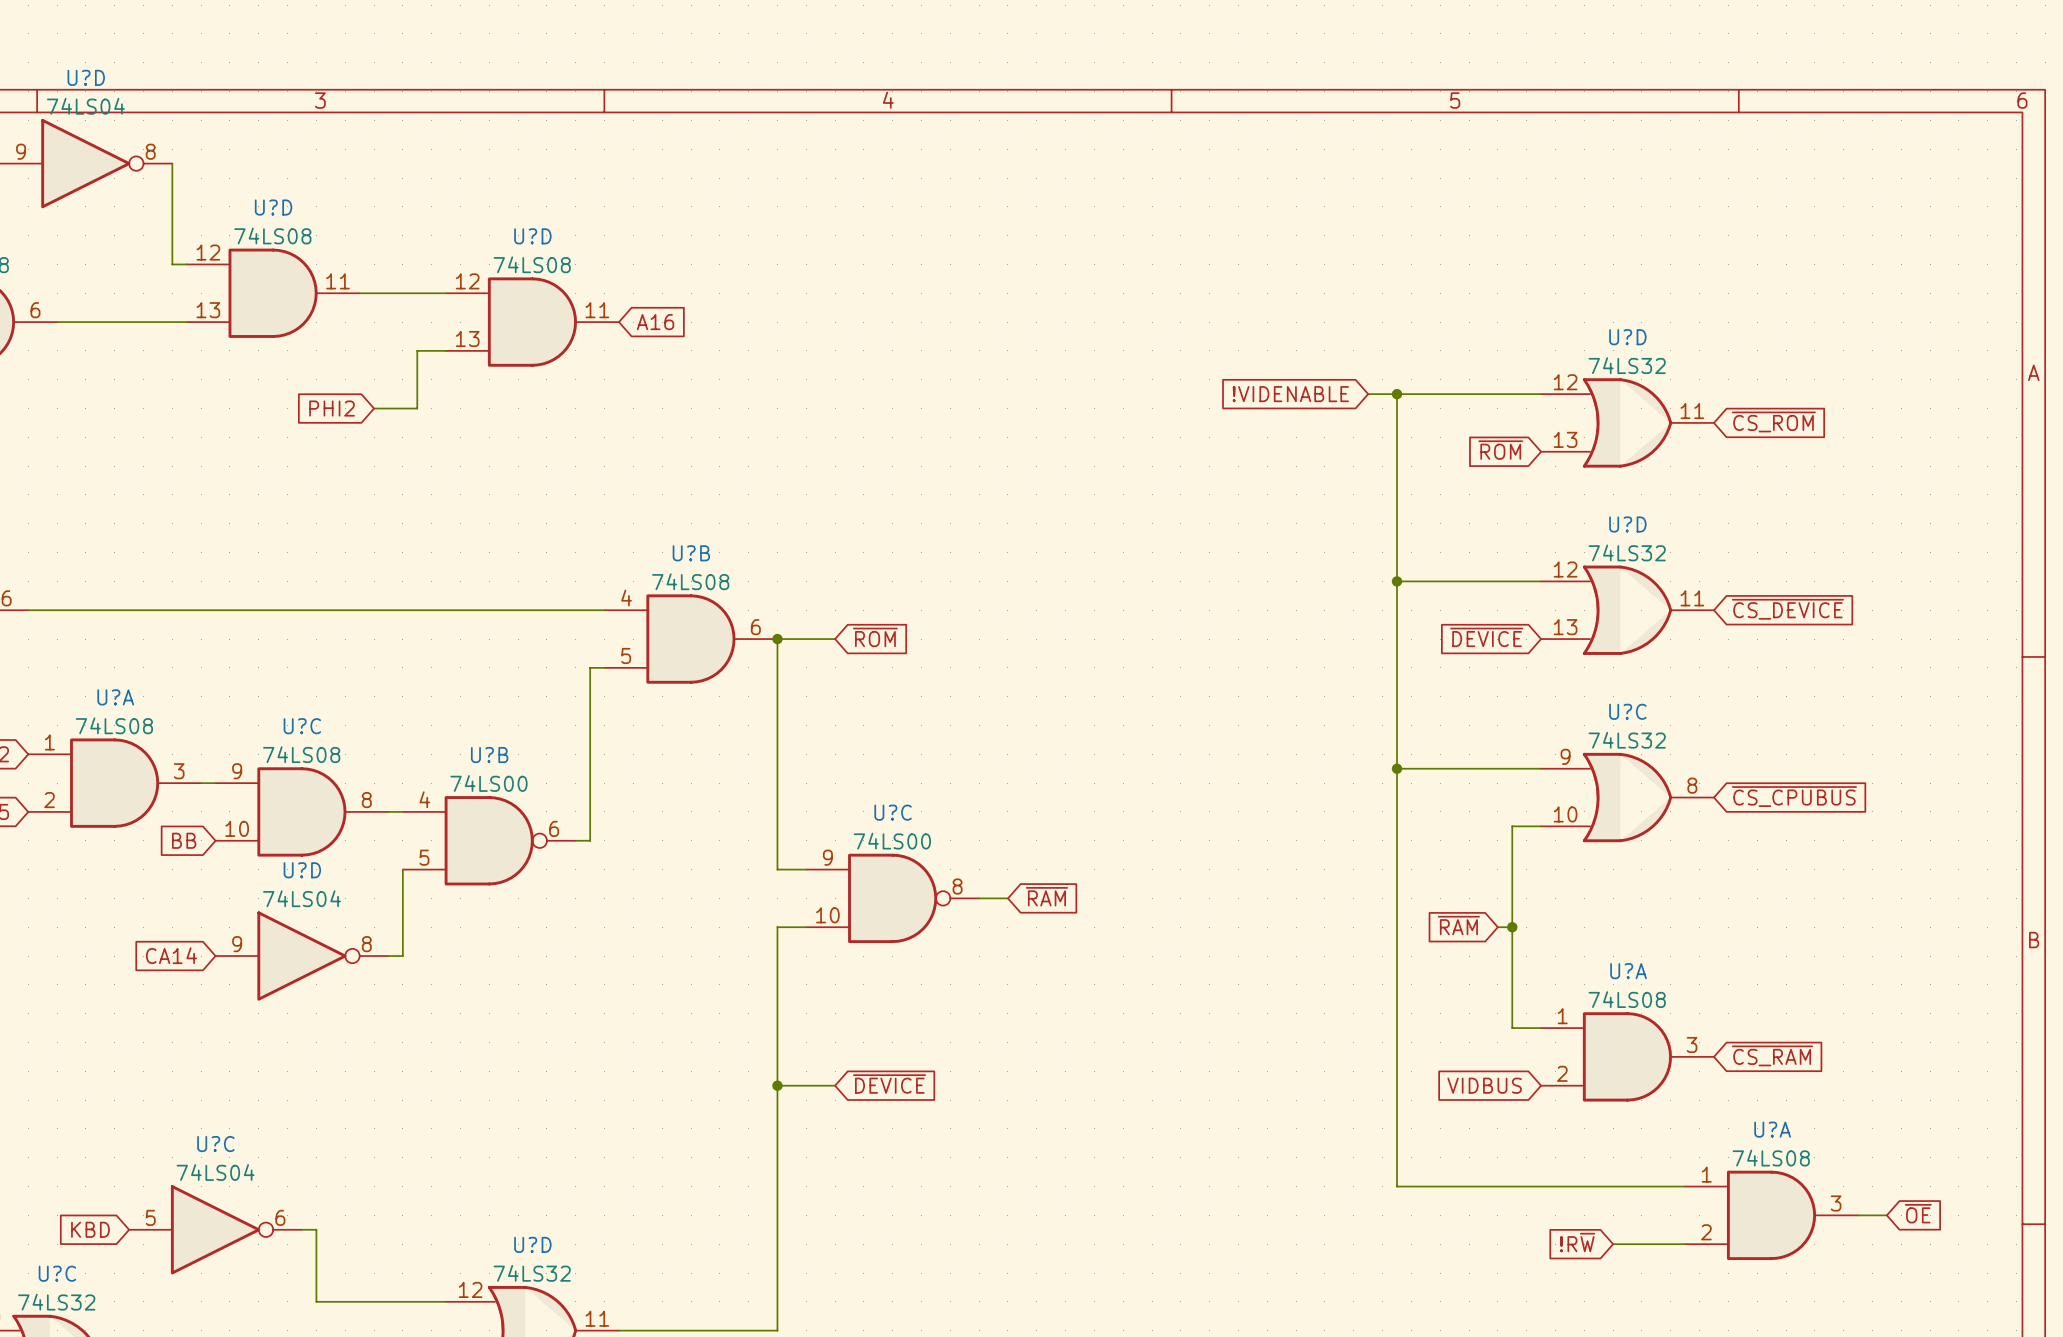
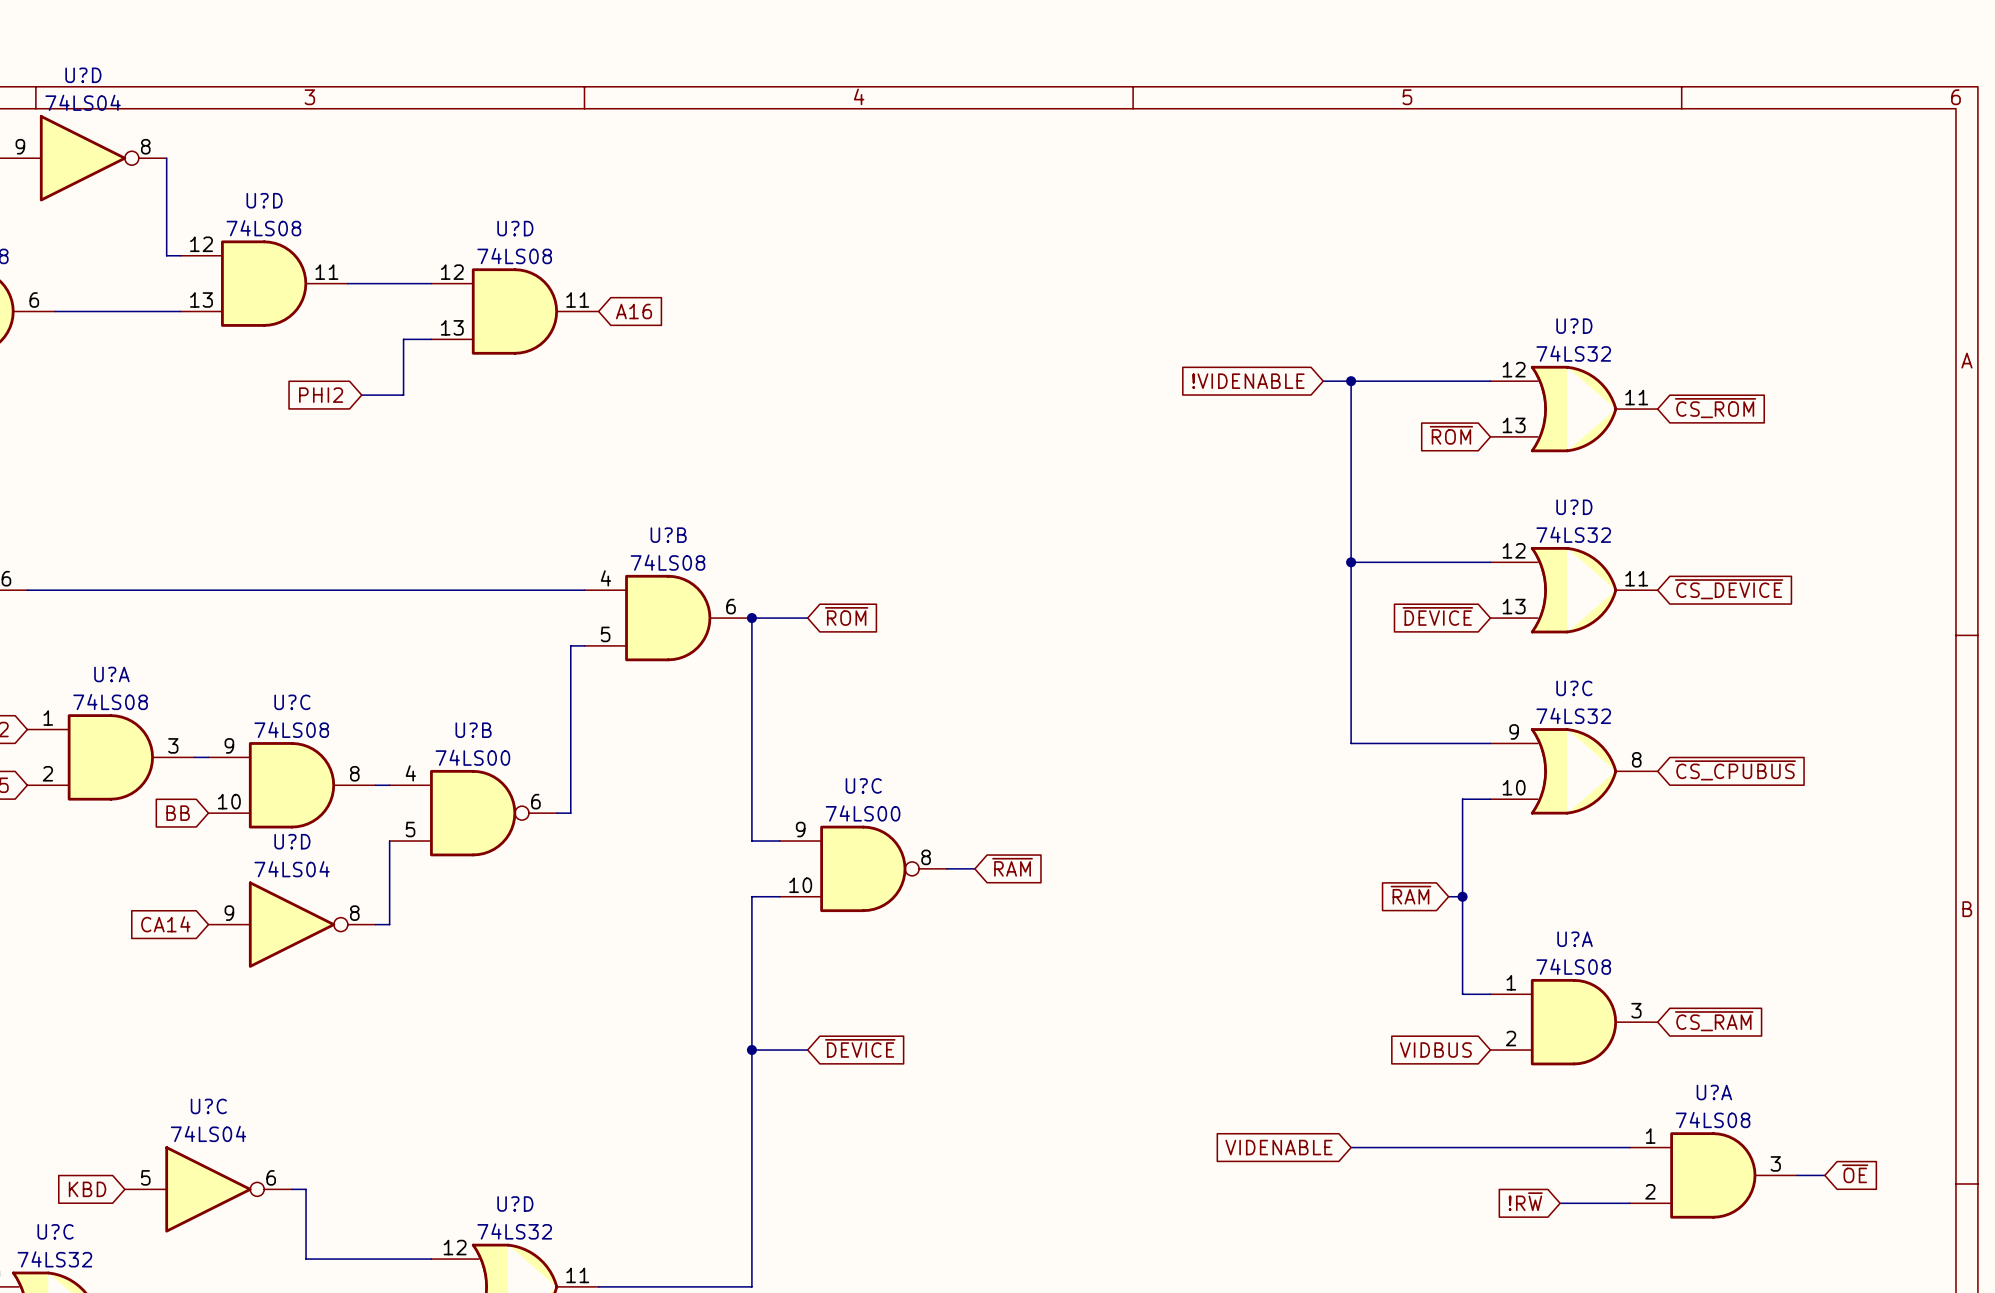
wire: (1397, 768) (1397, 1186) -> none
junction: (1397, 768) -> none
global label: none -> VIDENABLE (1278, 1147)

